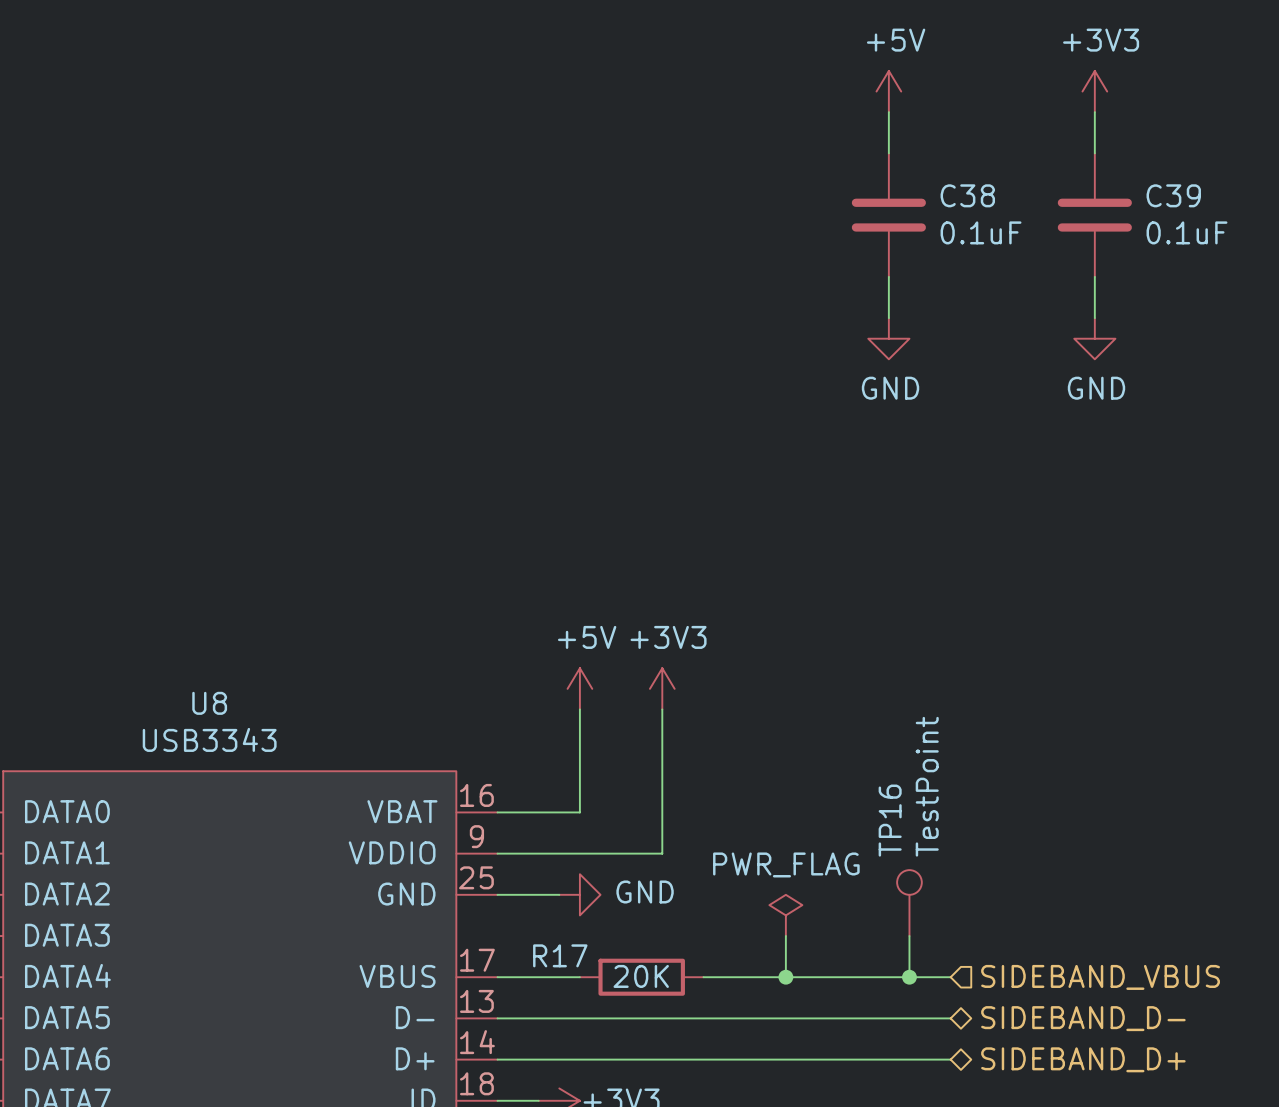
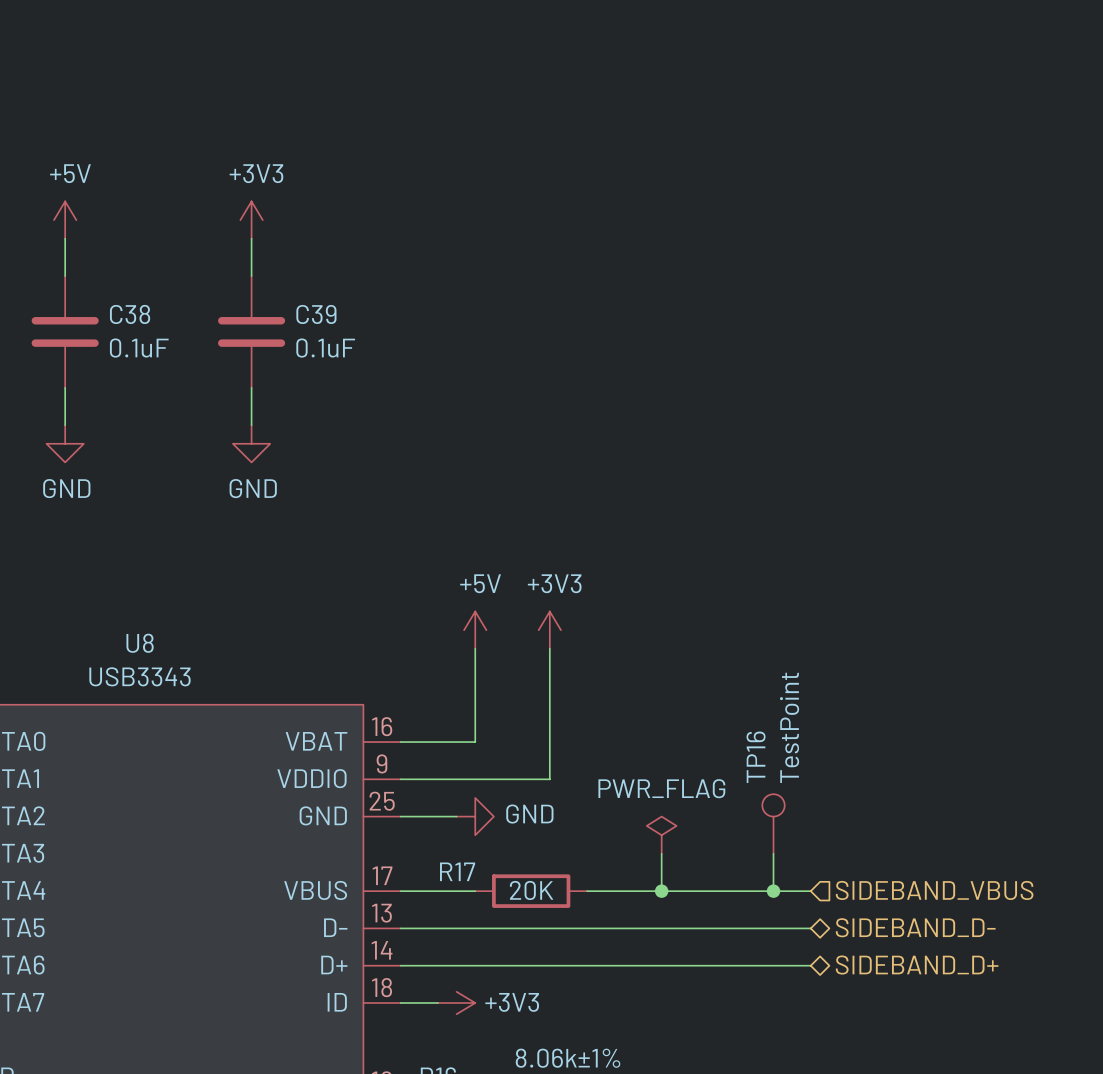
power symbol: +5V (888, 91) -> none
power symbol: +3V3 (1094, 91) -> none
wire: (888, 112) (888, 153) -> none
wire: (1094, 112) (1094, 153) -> none
C38 position: (888, 215) -> (65, 331)
C39 position: (1094, 215) -> (251, 331)
power symbol: none -> +5V (65, 220)
power symbol: none -> +3V3 (251, 220)
wire: none -> (65, 238) (65, 276)
wire: none -> (251, 238) (251, 276)
wire: (888, 276) (888, 318) -> none
wire: (1094, 276) (1094, 318) -> none
power symbol: GND (888, 338) -> none
power symbol: GND (1094, 338) -> none
wire: none -> (65, 387) (65, 425)
wire: none -> (251, 387) (251, 425)
power symbol: none -> GND (65, 443)
power symbol: none -> GND (251, 443)

